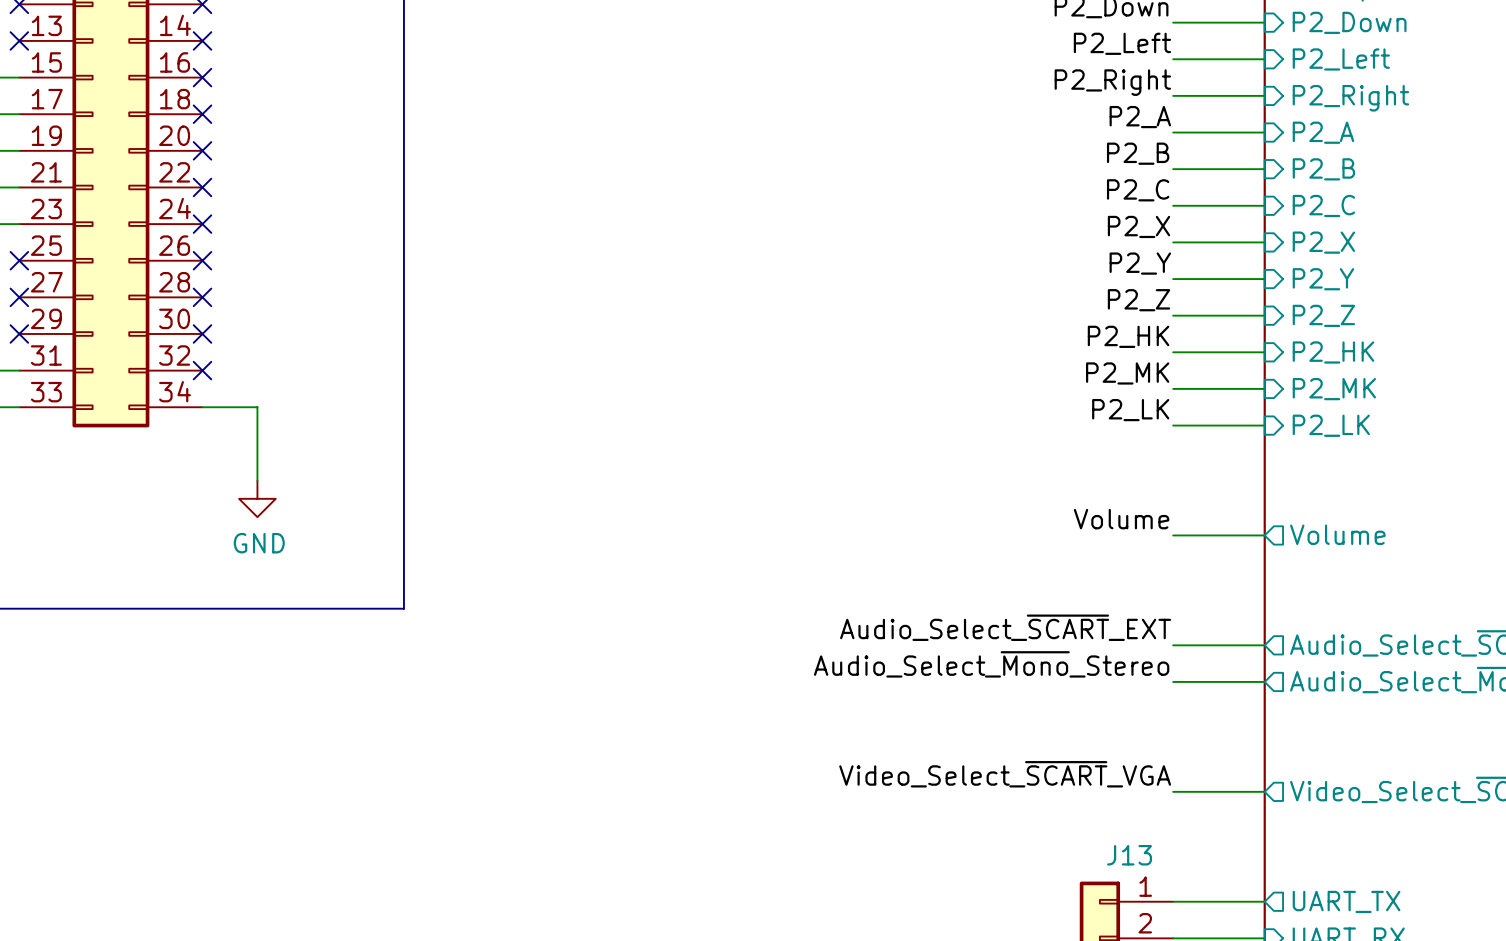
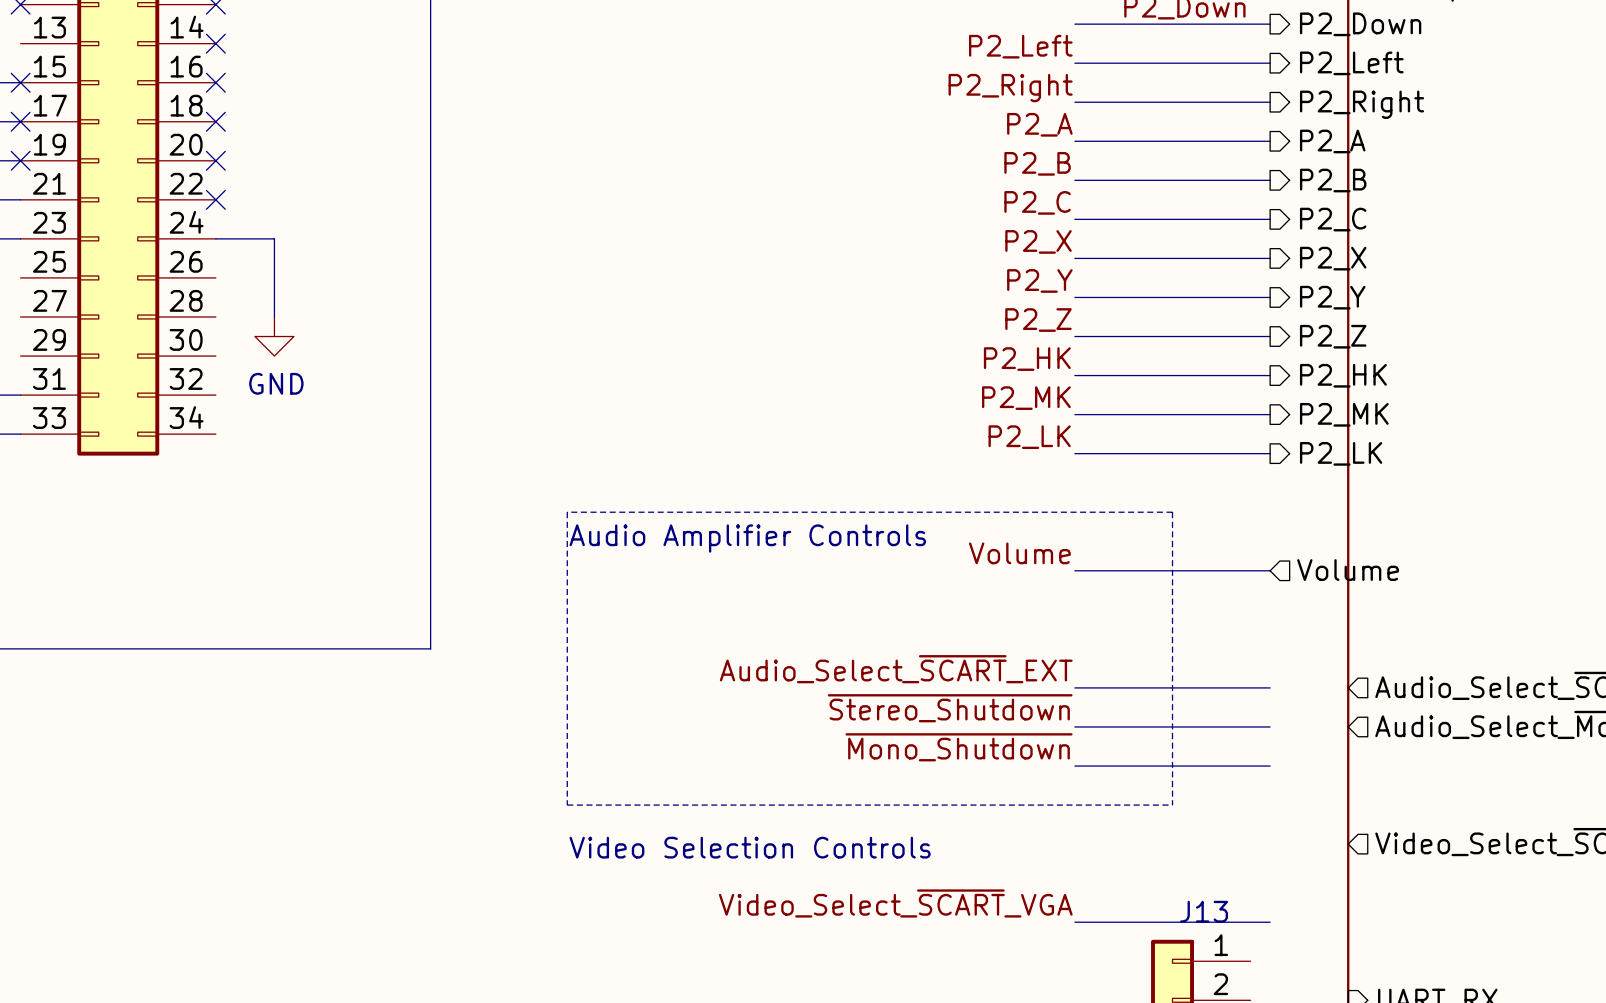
wire: none -> (1074, 24) (1250, 24)
wire: (1191, 22) (1264, 22) -> none
sheet pin position: P2_Down (1349, 22) -> P2_Down (1360, 24)
no-connect mark: (19, 40) -> none
label position: P2_Left (1122, 43) -> P2_Left (1020, 46)
wire: none -> (1074, 63) (1250, 63)
wire: (1191, 59) (1264, 59) -> none
sheet pin position: P2_Left (1341, 59) -> P2_Left (1351, 63)
no-connect mark: none -> (20, 82)
label position: P2_Right (1112, 82) -> P2_Right (1010, 88)
wire: none -> (1074, 102) (1250, 102)
wire: (1191, 95) (1264, 95) -> none
sheet pin position: P2_Right (1350, 98) -> P2_Right (1362, 104)
no-connect mark: none -> (20, 121)
label position: P2_A (1140, 117) -> P2_A (1039, 124)
wire: none -> (1074, 141) (1250, 141)
wire: (1191, 132) (1264, 132) -> none
sheet pin position: P2_A (1323, 132) -> P2_A (1332, 141)
no-connect mark: none -> (20, 160)
label position: P2_B (1138, 153) -> P2_B (1037, 163)
wire: none -> (1074, 180) (1250, 180)
wire: (1191, 169) (1264, 169) -> none
sheet pin position: P2_B (1323, 169) -> P2_B (1333, 180)
label position: P2_C (1138, 190) -> P2_C (1037, 202)
wire: none -> (1074, 219) (1250, 219)
wire: (1191, 205) (1264, 205) -> none
sheet pin position: P2_C (1323, 205) -> P2_C (1333, 219)
no-connect mark: (202, 224) -> none
label position: P2_X (1139, 226) -> P2_X (1038, 241)
wire: none -> (1074, 258) (1250, 258)
wire: (1191, 242) (1264, 242) -> none
sheet pin position: P2_X (1323, 242) -> P2_X (1333, 258)
no-connect mark: (19, 260) -> none
no-connect mark: (202, 260) -> none
label position: P2_Y (1140, 263) -> P2_Y (1039, 280)
wire: none -> (1074, 297) (1250, 297)
wire: (1191, 279) (1264, 279) -> none
sheet pin position: P2_Y (1323, 279) -> P2_Y (1332, 297)
no-connect mark: (19, 297) -> none
no-connect mark: (202, 297) -> none
label position: P2_Z (1139, 300) -> P2_Z (1038, 320)
wire: none -> (1074, 336) (1250, 336)
wire: (1191, 315) (1264, 315) -> none
sheet pin position: P2_Z (1323, 315) -> P2_Z (1333, 336)
no-connect mark: (19, 333) -> none
no-connect mark: (202, 333) -> none
label position: P2_HK (1128, 336) -> P2_HK (1027, 359)
wire: none -> (1074, 375) (1250, 375)
wire: (1191, 352) (1264, 352) -> none
sheet pin position: P2_HK (1333, 352) -> P2_HK (1343, 375)
no-connect mark: (202, 370) -> none
label position: P2_MK (1127, 373) -> P2_MK (1026, 398)
wire: none -> (1074, 414) (1250, 414)
wire: (1191, 388) (1264, 388) -> none
sheet pin position: P2_MK (1334, 389) -> P2_MK (1344, 414)
wire: (202, 407) (257, 407) (257, 480) -> (215, 238) (274, 238) (274, 316)
label position: P2_LK (1130, 410) -> P2_LK (1029, 437)
wire: none -> (1074, 453) (1250, 453)
wire: (1191, 425) (1264, 425) -> none
sheet pin position: P2_LK (1331, 425) -> P2_LK (1341, 453)
line: none -> (567, 512) (567, 805) (1172, 805) (1172, 512) (567, 512)
power symbol position: GND (257, 498) -> GND (274, 336)
text: none -> Audio Amplifier Controls (747, 538)
label position: Volume (1121, 519) -> Volume (1019, 553)
sheet pin position: Volume (1337, 534) -> Volume (1348, 570)
wire: none -> (1074, 570) (1250, 570)
wire: (1191, 535) (1264, 535) -> none
label position: Audio_Select_~{SCART}_EXT (1005, 627) -> Audio_Select_~{SCART}_EXT (896, 669)
wire: none -> (1074, 687) (1250, 687)
wire: (1191, 645) (1264, 645) -> none
label: none -> ~{Stereo_Shutdown} (950, 708)
label: Audio_Select_~{Mono}_Stereo (991, 664) -> none
wire: none -> (1074, 726) (1250, 726)
wire: (1191, 681) (1264, 681) -> none
label: none -> ~{Mono_Shutdown} (959, 747)
wire: none -> (1074, 766) (1270, 766)
label position: Video_Select_~{SCART}_VGA (1005, 774) -> Video_Select_~{SCART}_VGA (895, 903)
wire: (1173, 791) (1264, 791) -> none
text: none -> Video Selection Controls (750, 847)
wire: none -> (1074, 922) (1270, 922)
wire: (1173, 901) (1264, 901) -> none
sheet pin: UART_TX (1346, 901) -> none
wire: (1173, 938) (1264, 938) -> none

